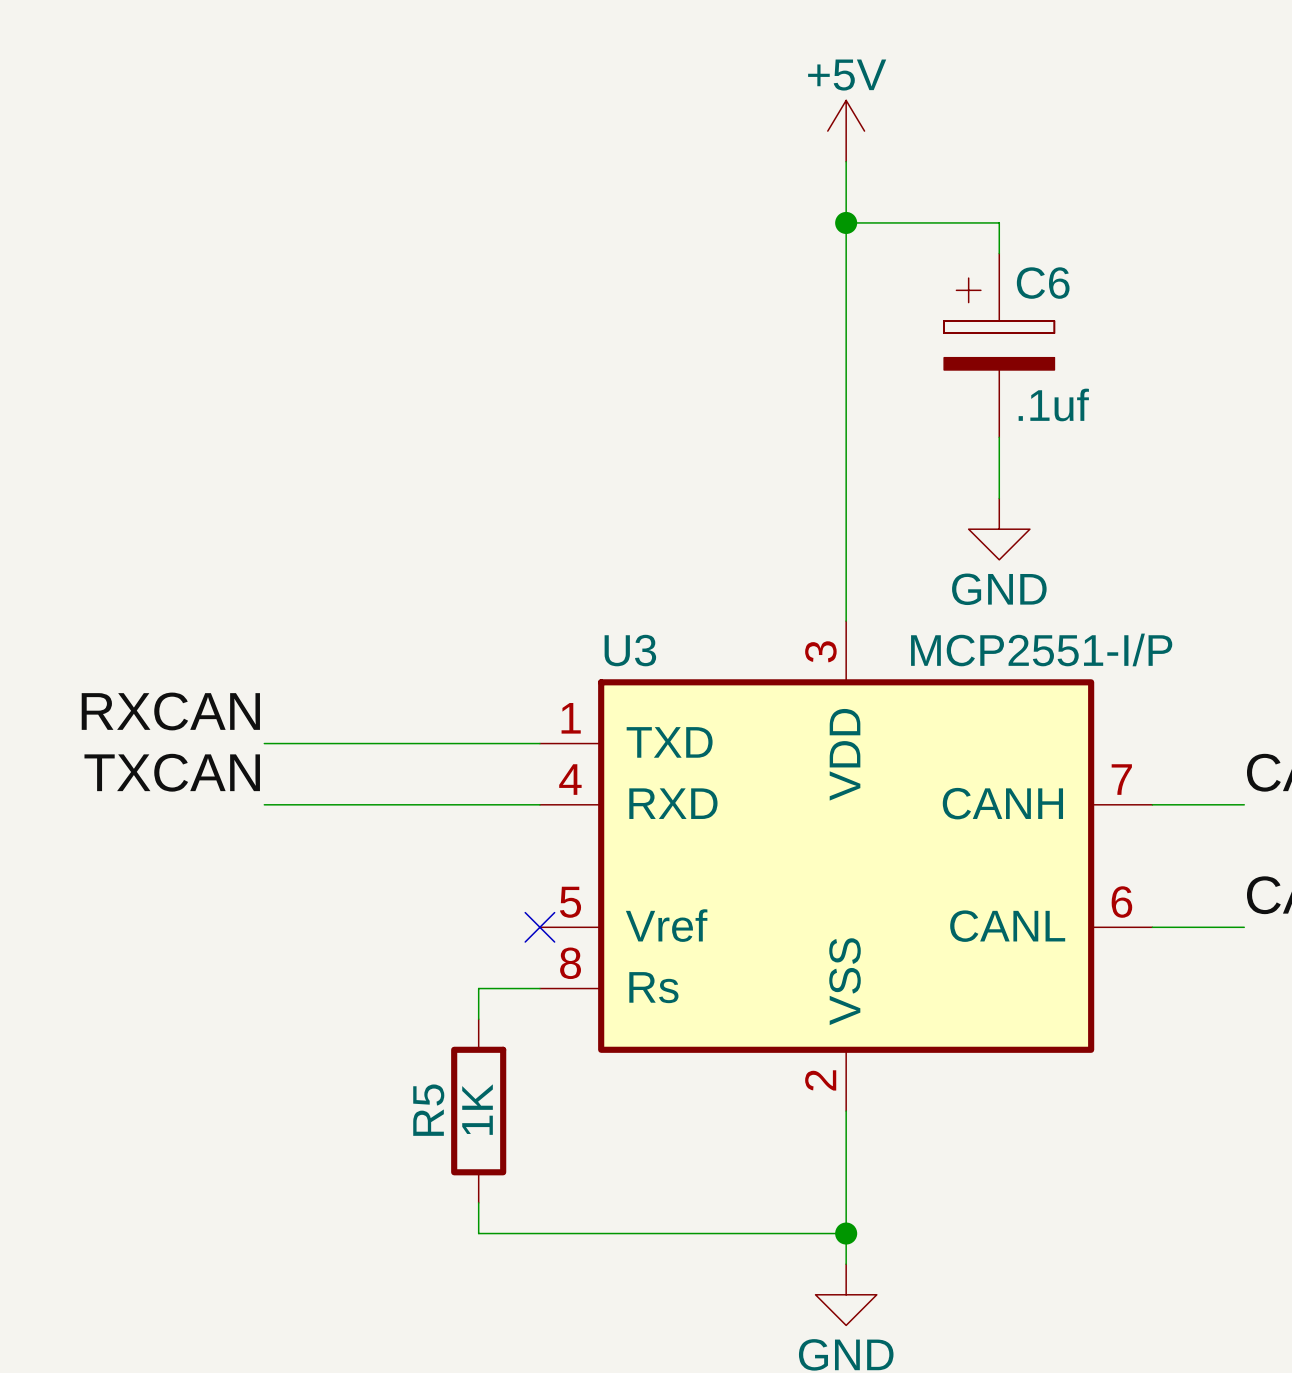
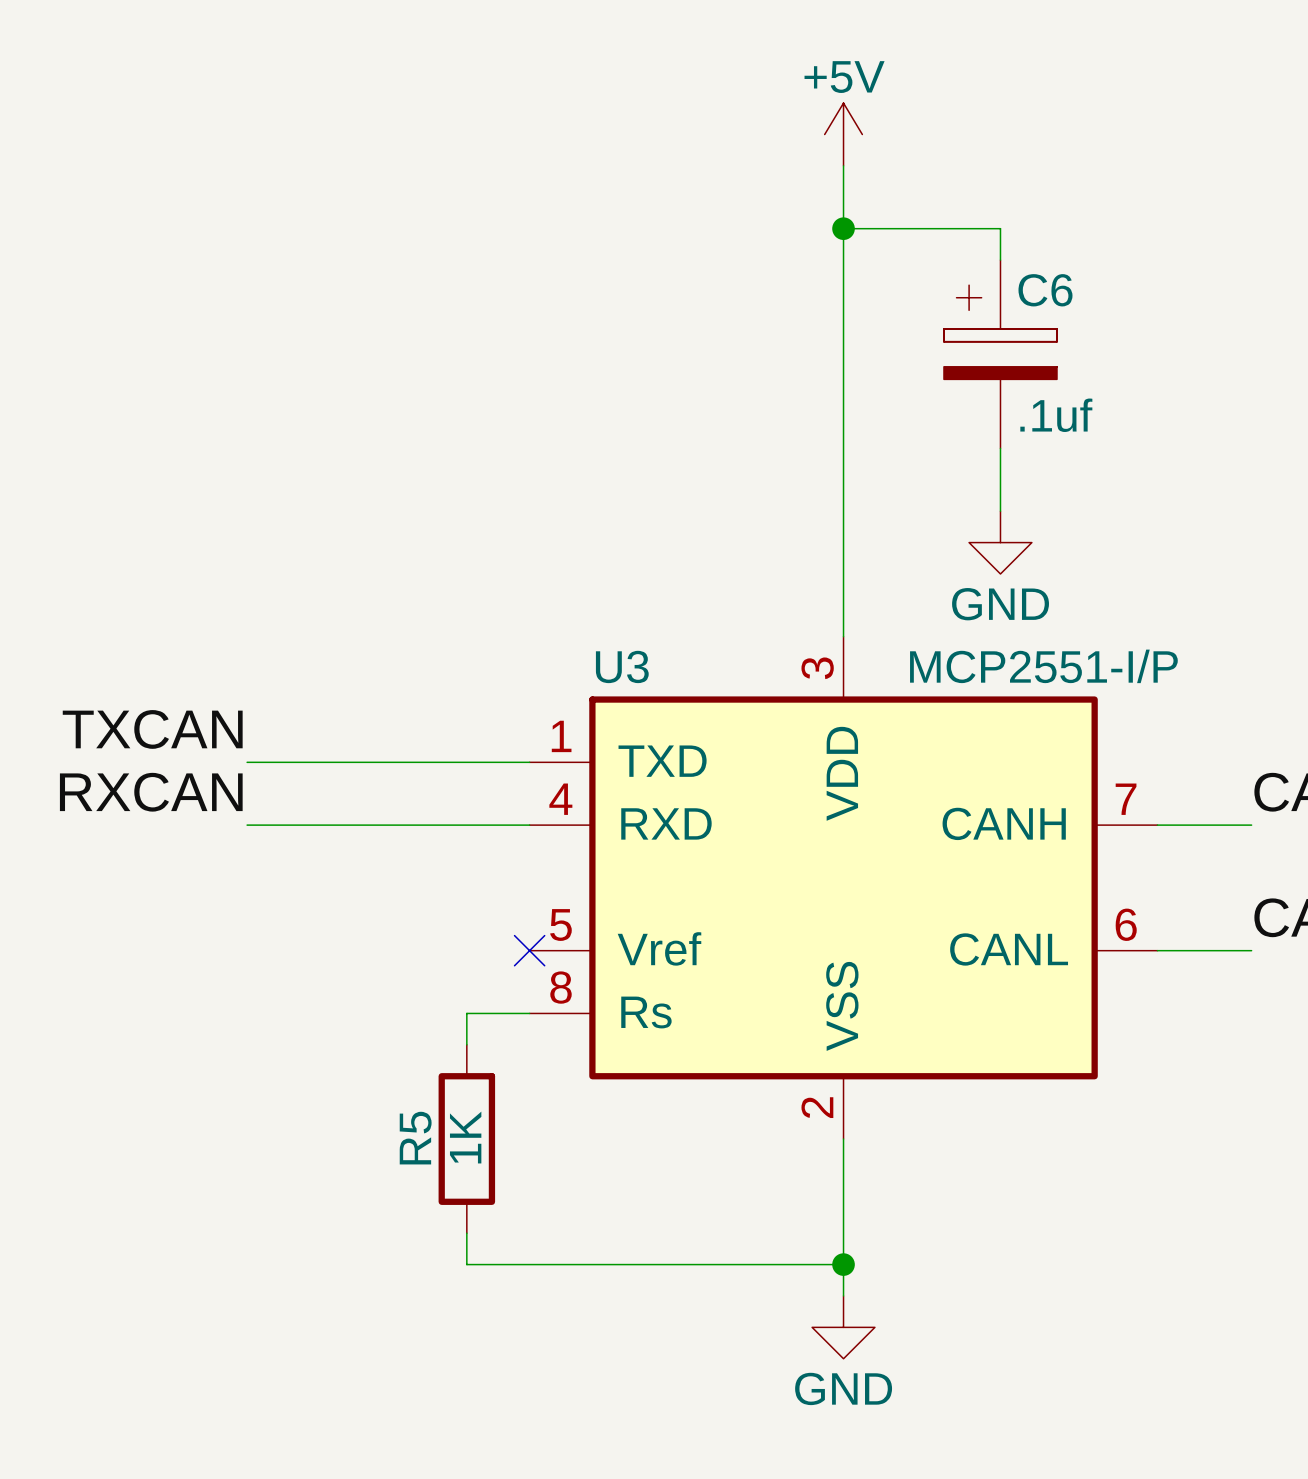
label: RXCAN (170, 711) -> TXCAN (152, 729)
label: TXCAN (172, 772) -> RXCAN (151, 792)

